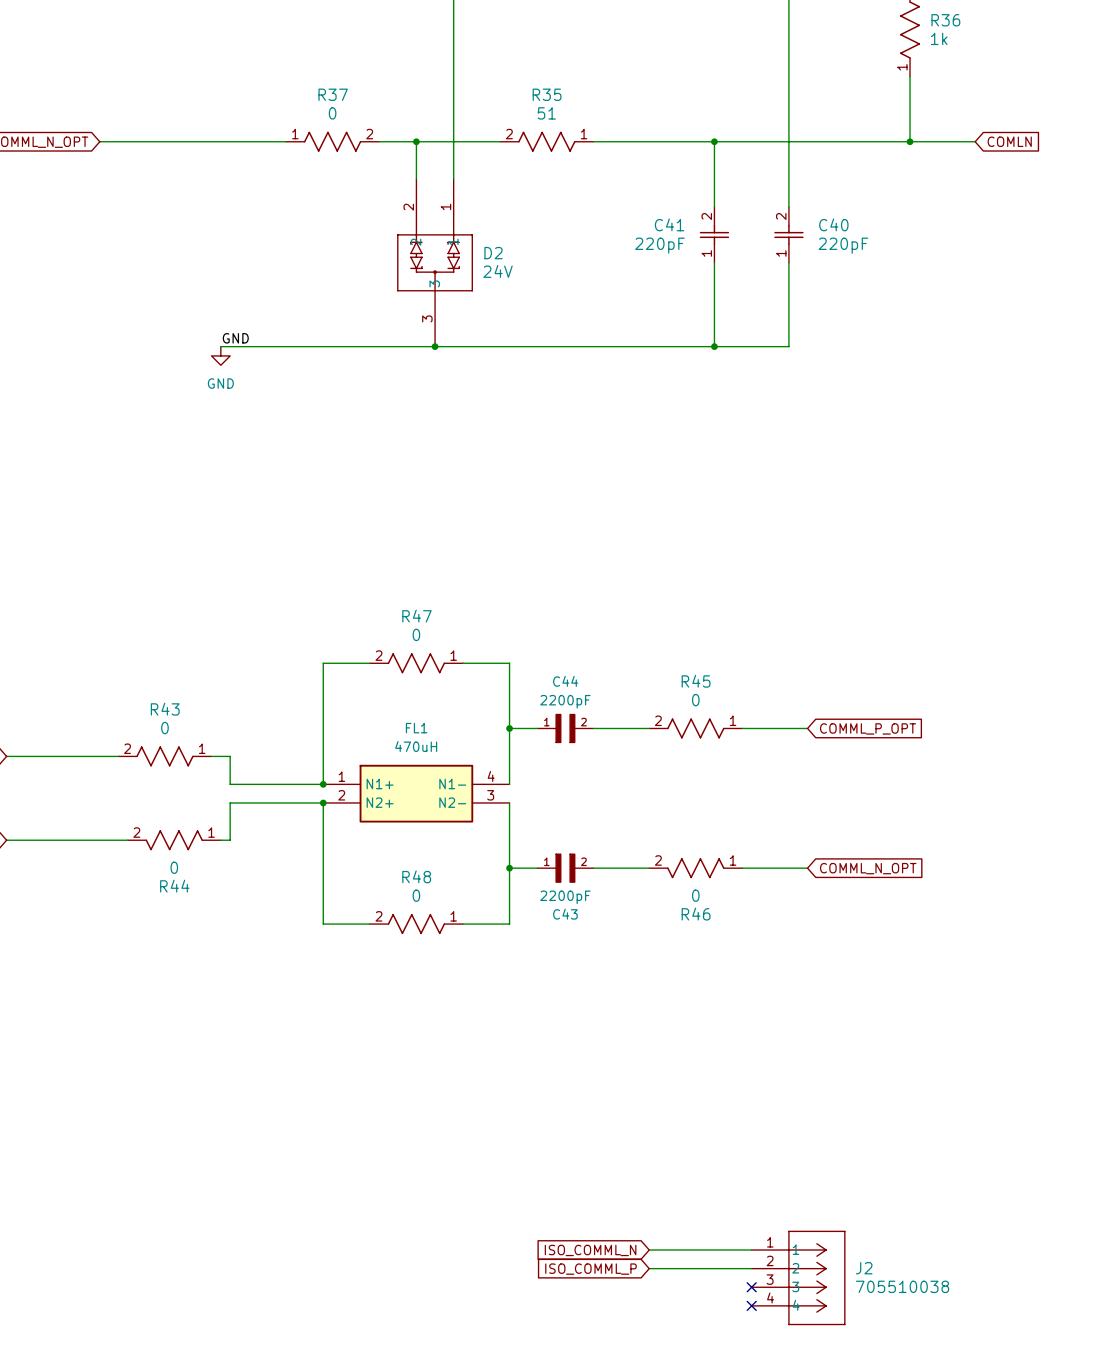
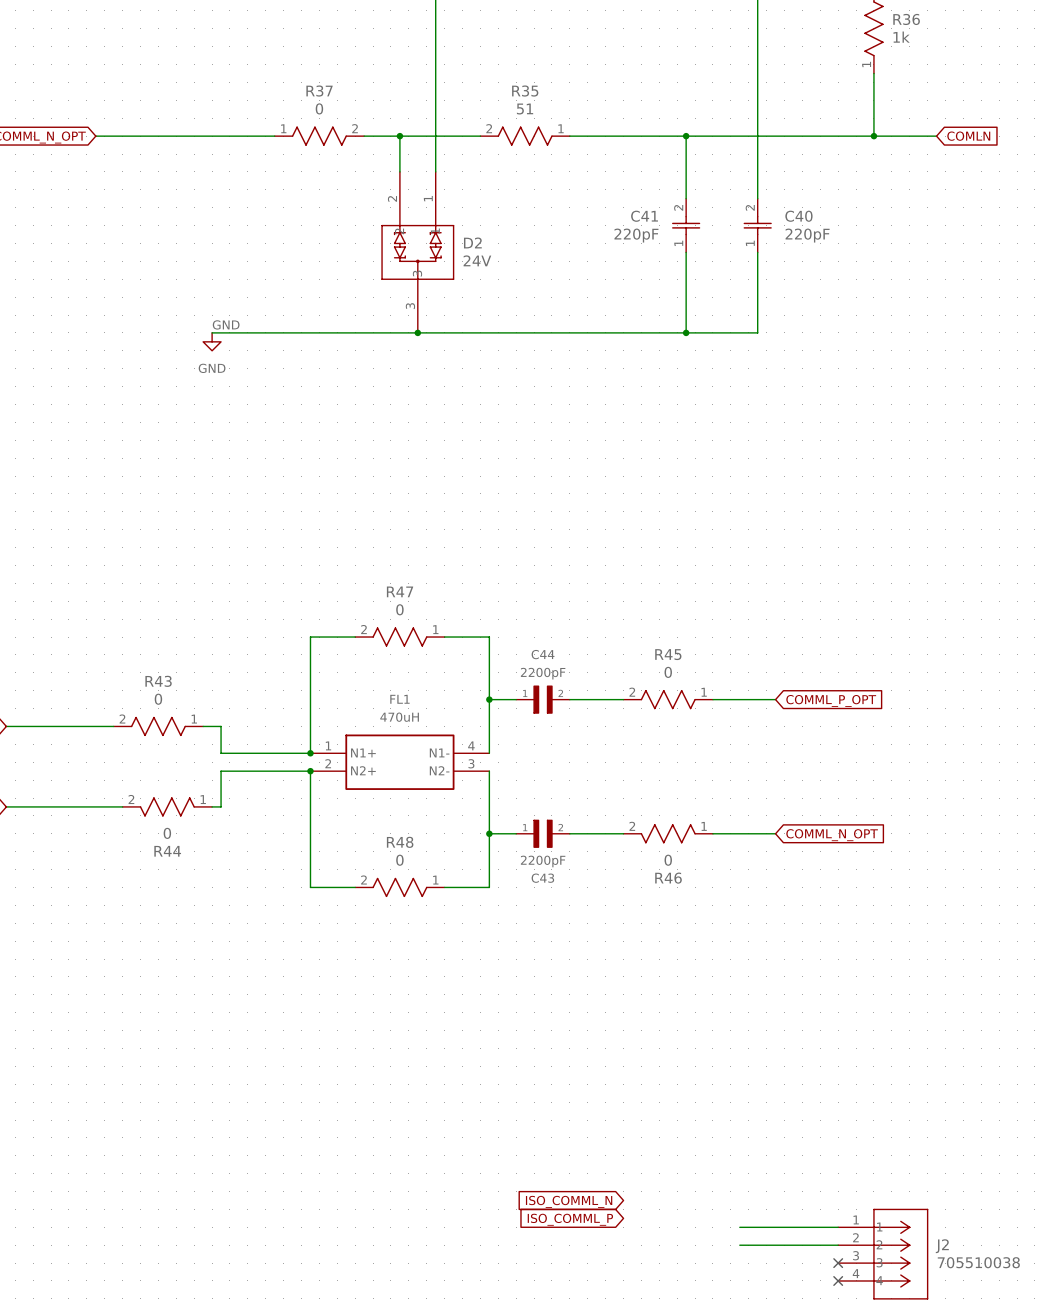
wire: (649, 1250) (751, 1250) -> (739, 1227) (838, 1227)
wire: (649, 1268) (751, 1268) -> (739, 1245) (838, 1245)
J2 position: (798, 1277) -> (883, 1254)
no-connect mark: (751, 1287) -> none
no-connect mark: (751, 1305) -> none
no-connect mark: none -> (838, 1263)
no-connect mark: none -> (838, 1280)

